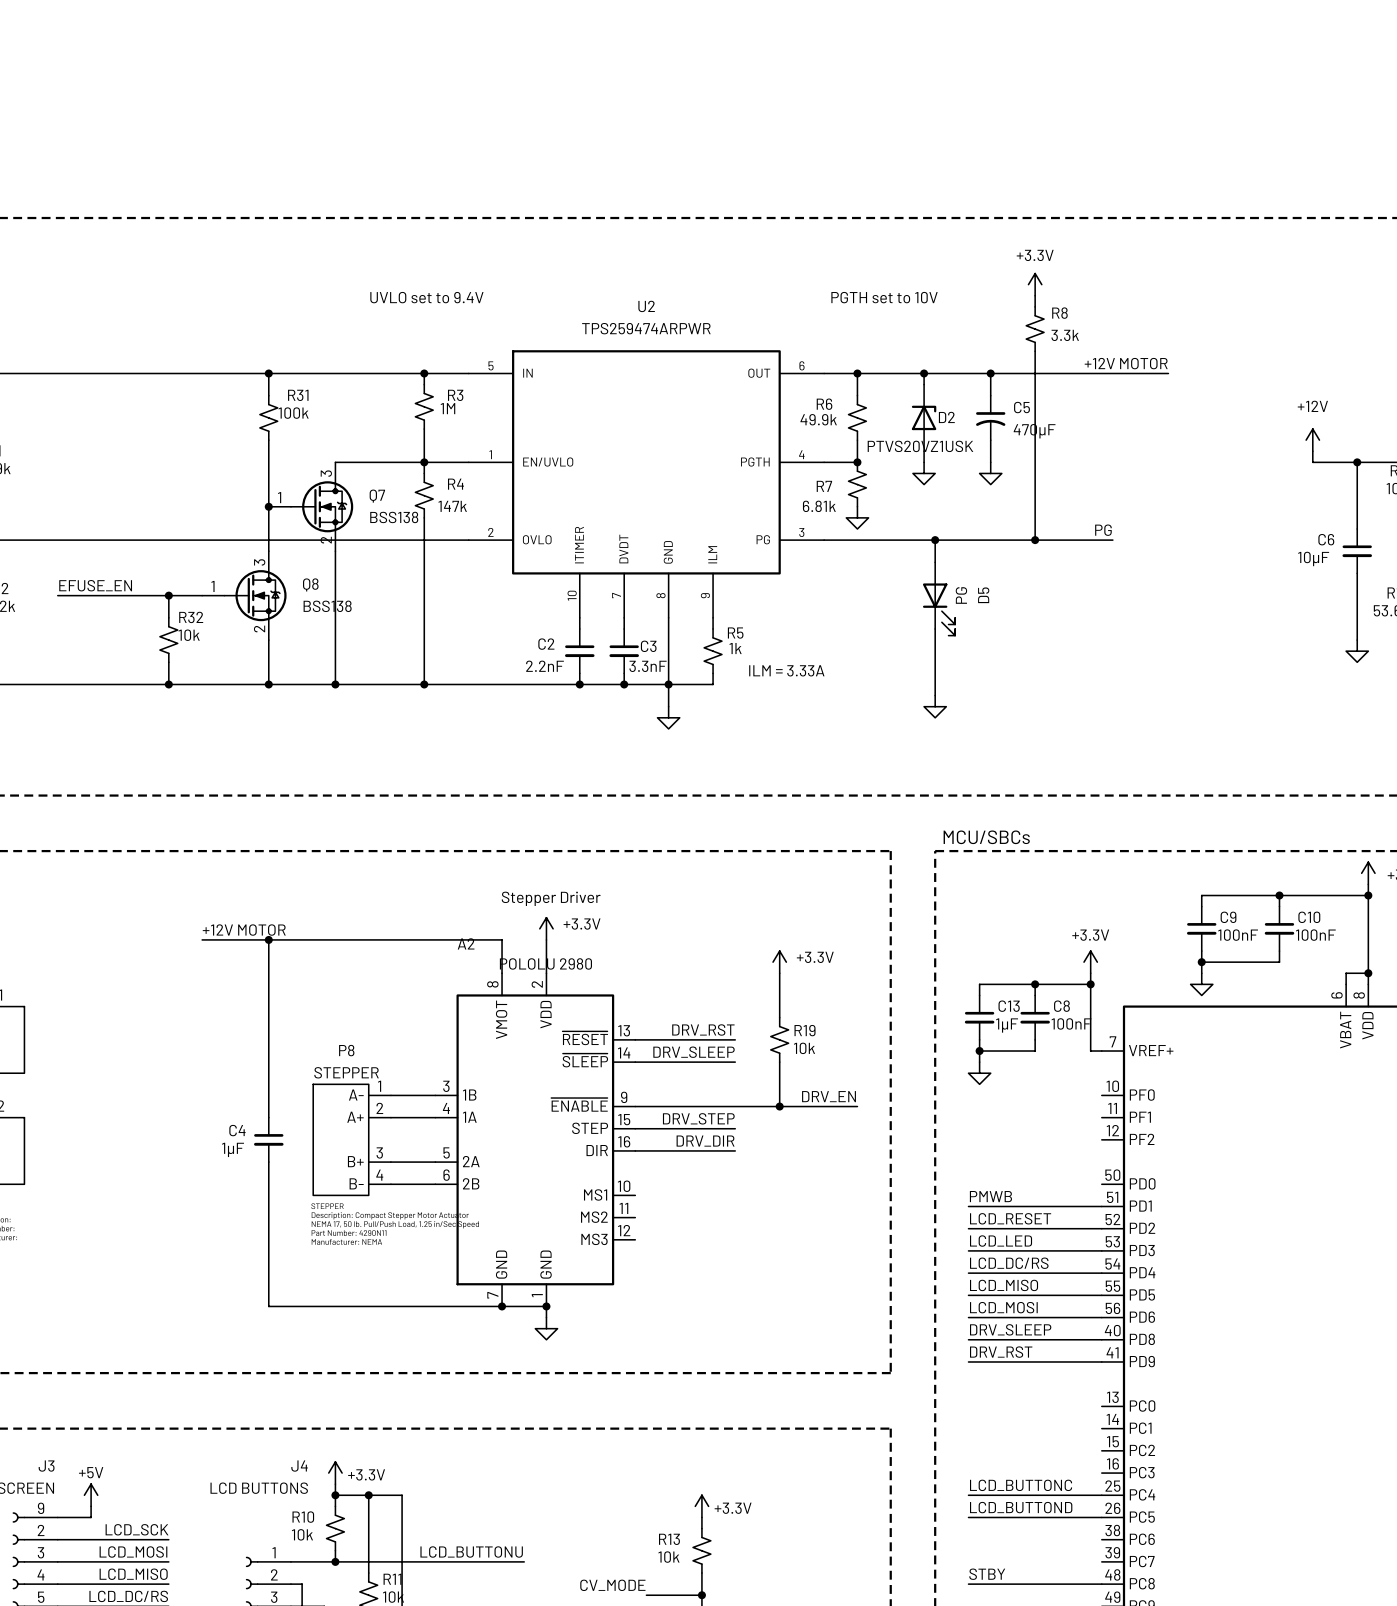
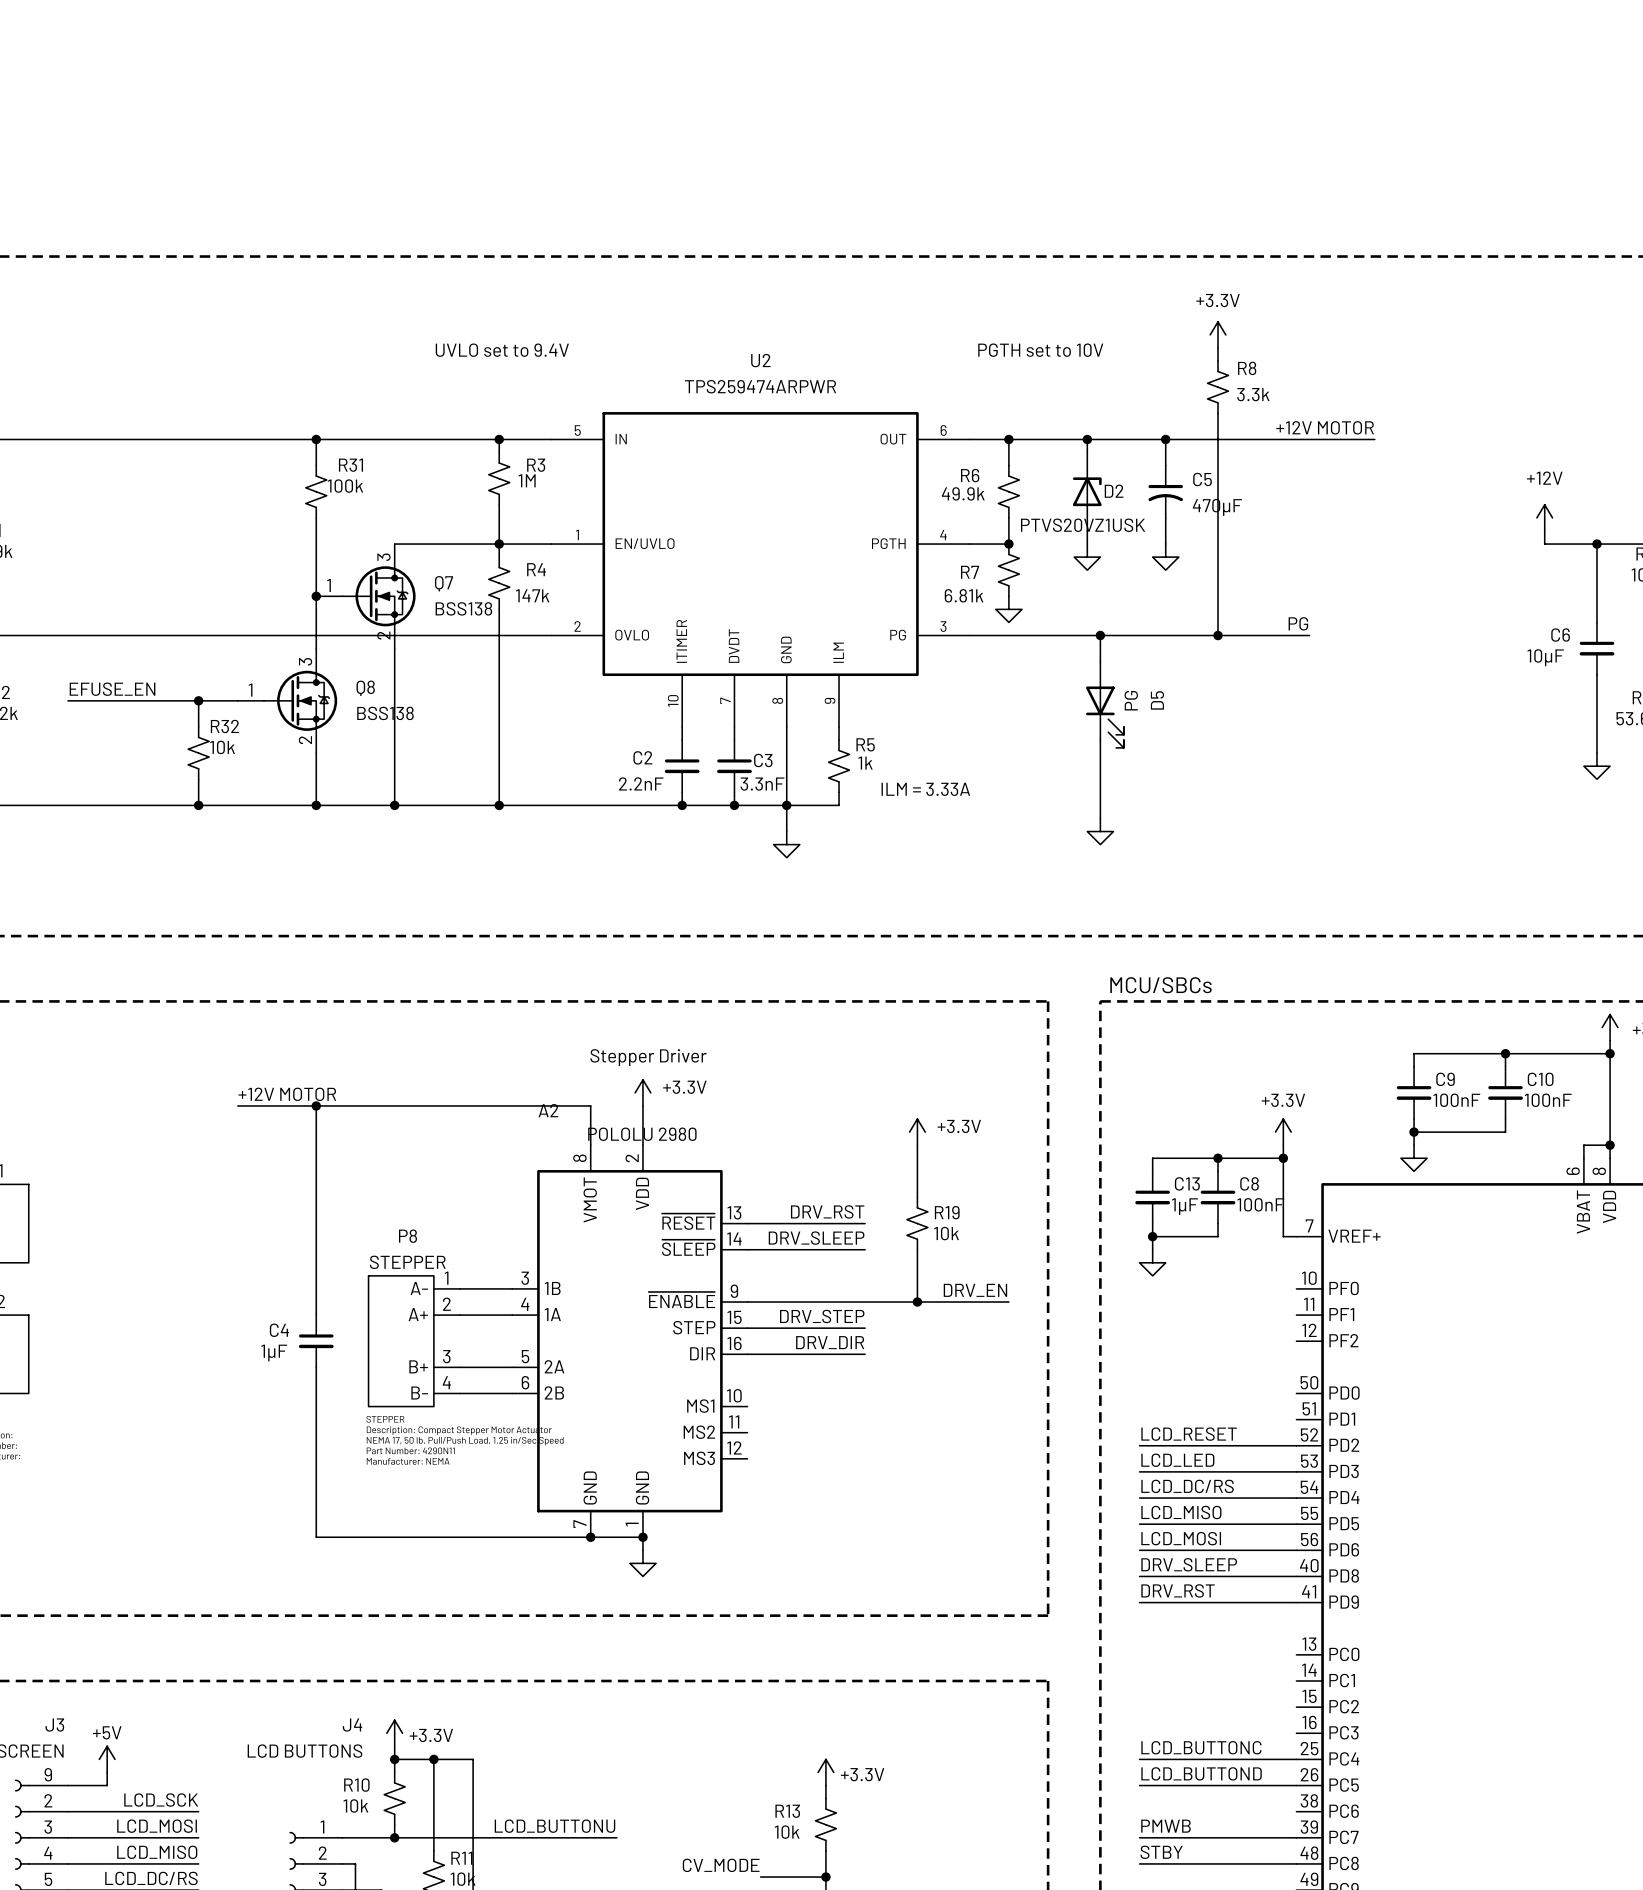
label: PMWB (990, 1196) -> none
wire: (968, 1206) (1101, 1206) -> none
label: none -> PMWB (1165, 1826)
wire: none -> (1139, 1837) (1296, 1837)

